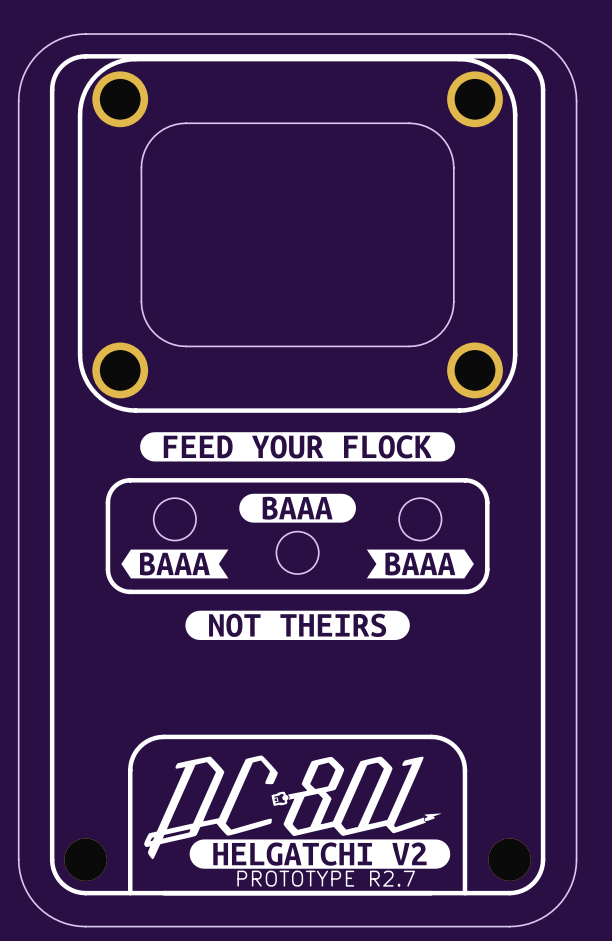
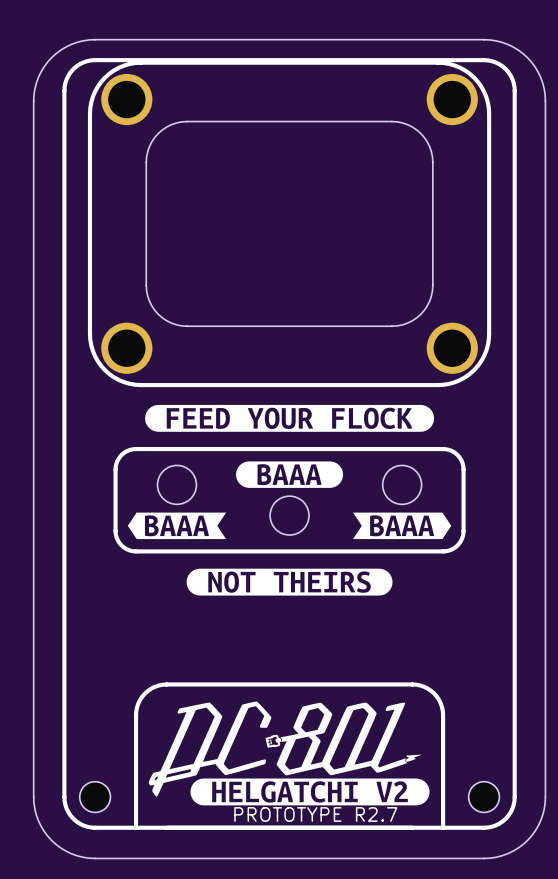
part footprint: [64, 838, 107, 881] -> [79, 781, 111, 813]
part footprint: [488, 838, 531, 881] -> [468, 781, 500, 813]

